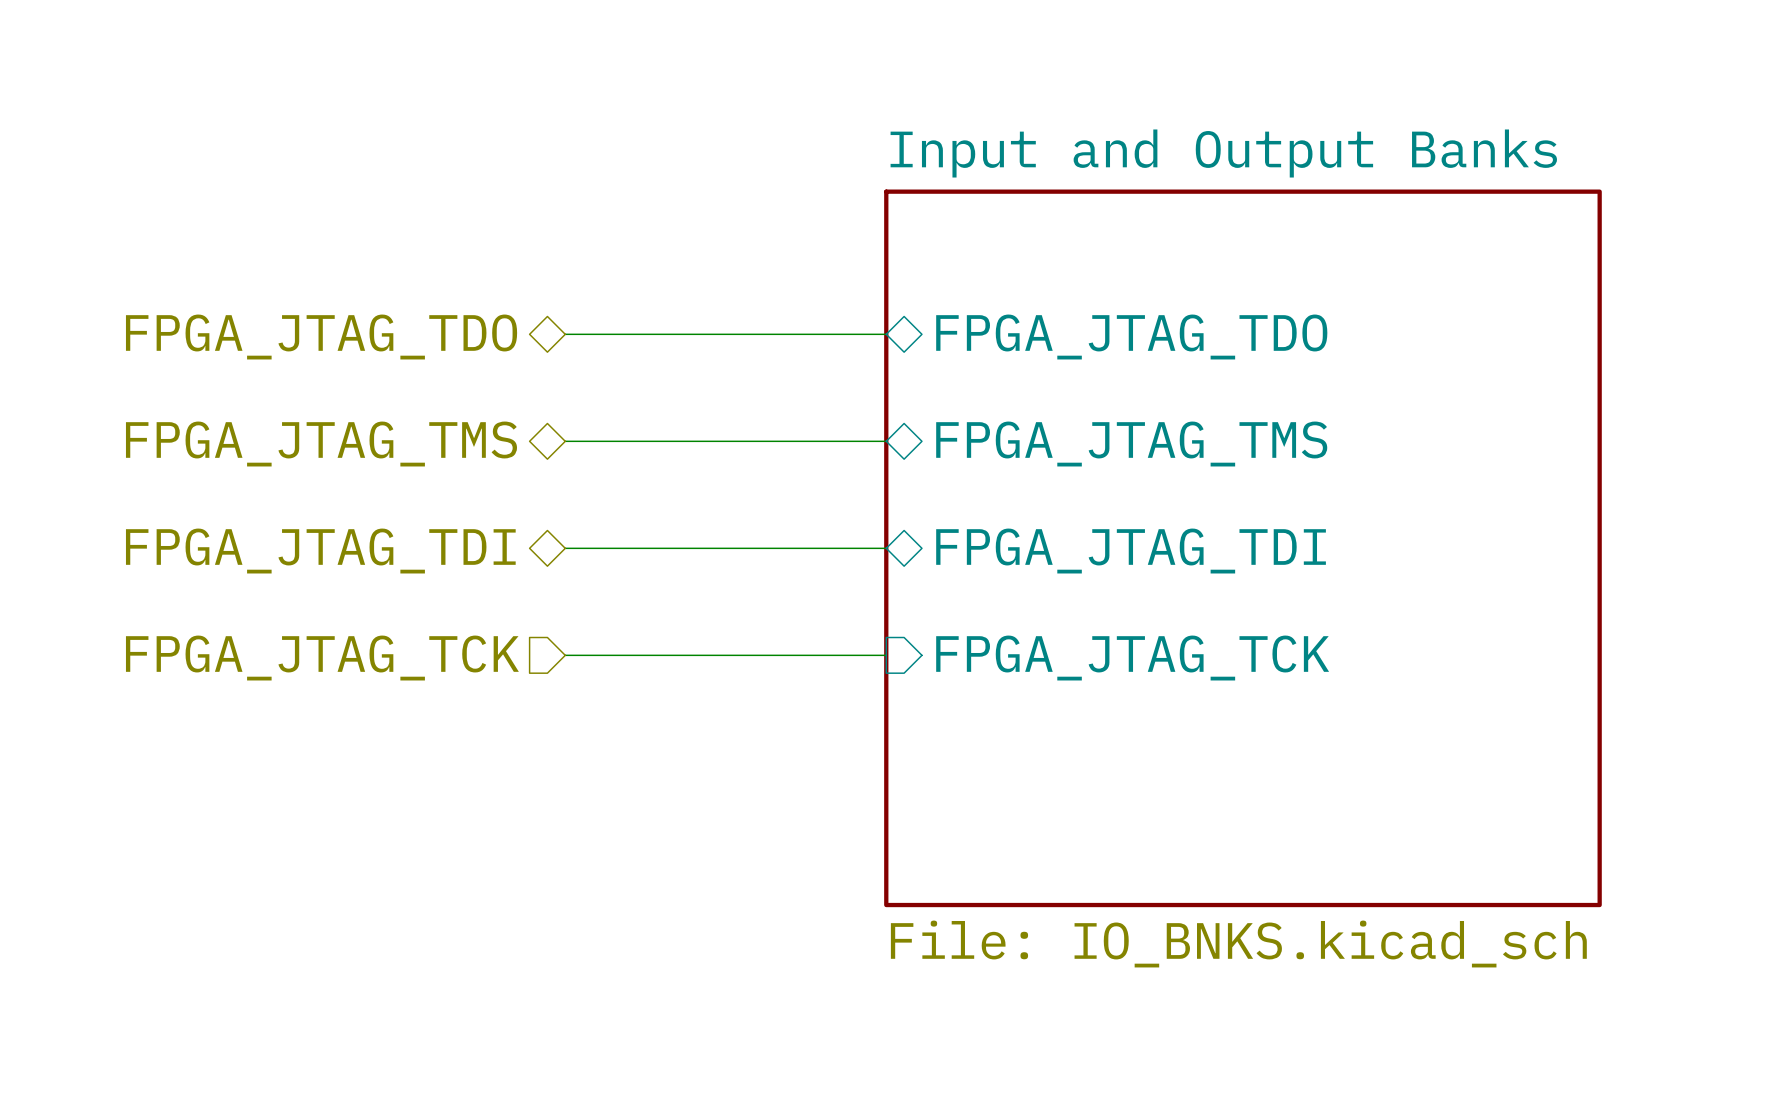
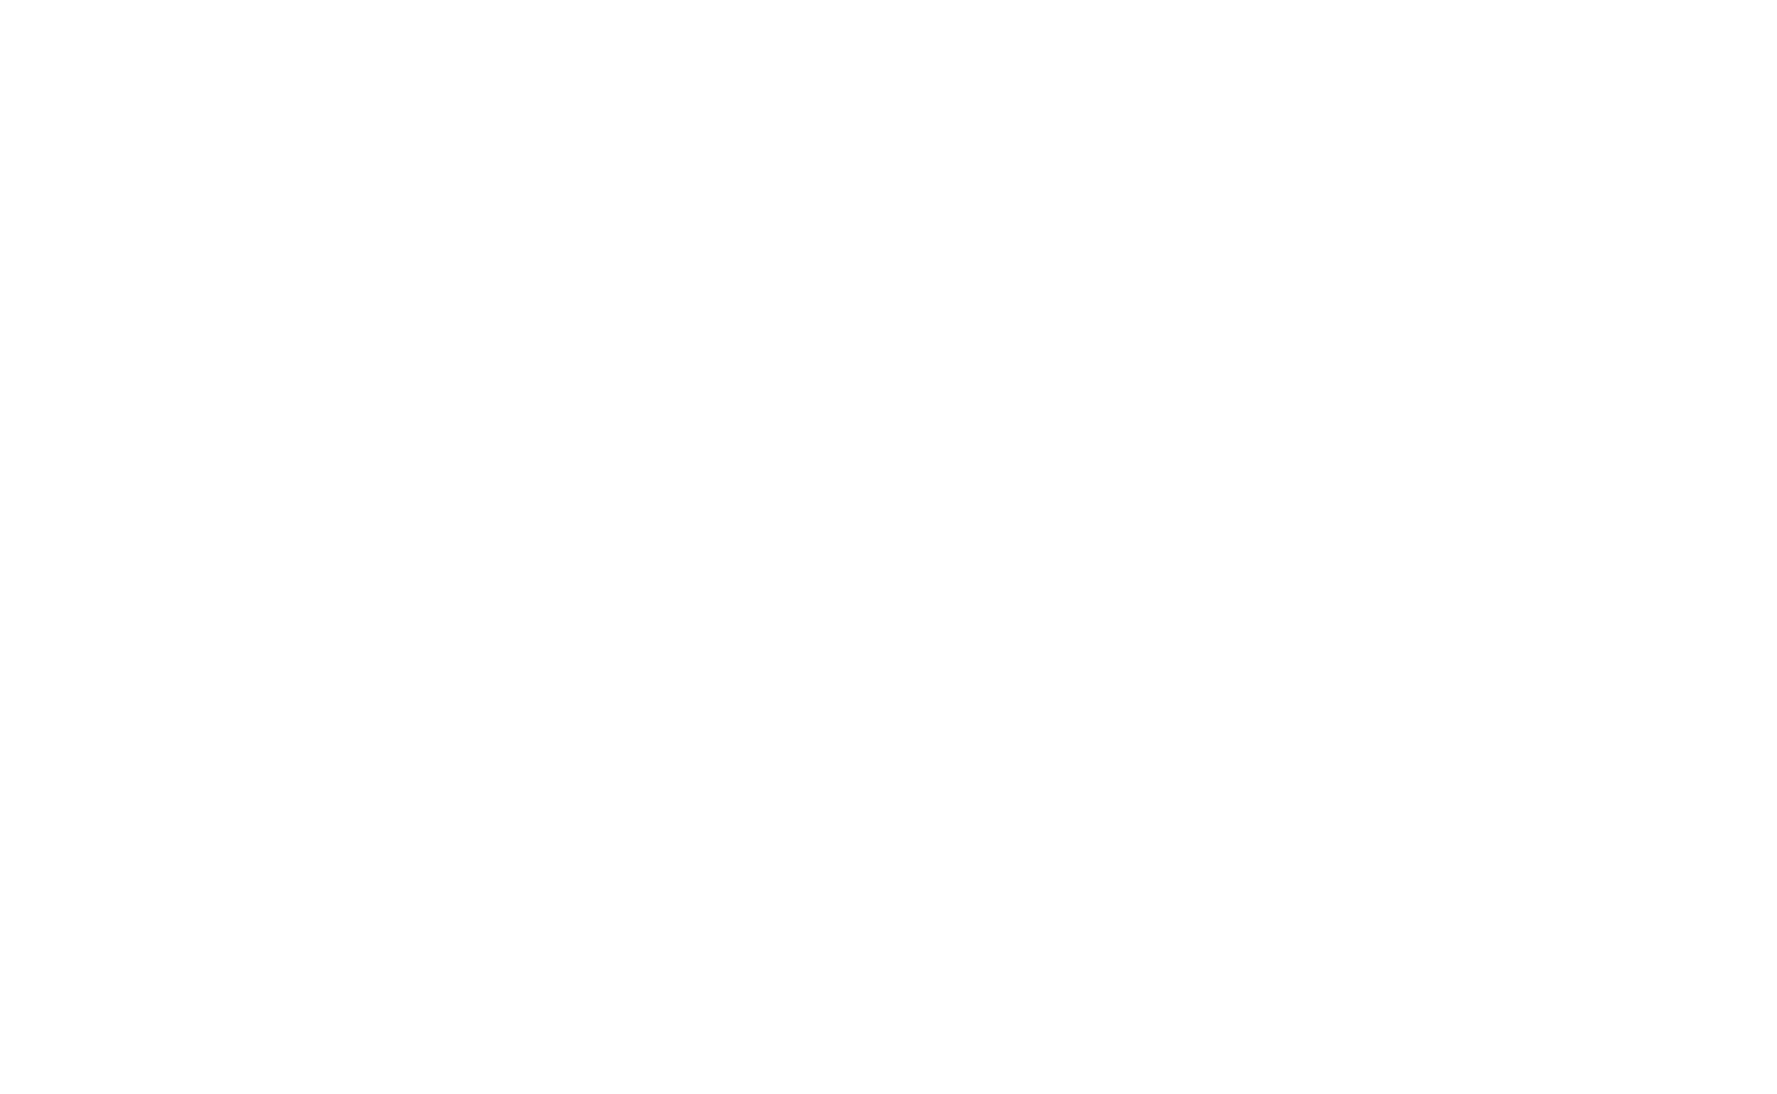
wire: (565, 334) (886, 334) -> none
hierarchical label: FPGA_JTAG_TDO (321, 337) -> none
sheet pin: FPGA_JTAG_TDO (1131, 337) -> none
wire: (565, 441) (886, 441) -> none
hierarchical label: FPGA_JTAG_TMS (321, 444) -> none
sheet pin: FPGA_JTAG_TMS (1131, 444) -> none
wire: (565, 548) (886, 548) -> none
sheet Input and Output Banks: File: IO_BNKS.kicad_sch (1242, 548) -> none
hierarchical label: FPGA_JTAG_TDI (320, 551) -> none
sheet pin: FPGA_JTAG_TDI (1131, 551) -> none
wire: (565, 655) (886, 655) -> none
hierarchical label: FPGA_JTAG_TCK (322, 658) -> none
sheet pin: FPGA_JTAG_TCK (1132, 658) -> none

